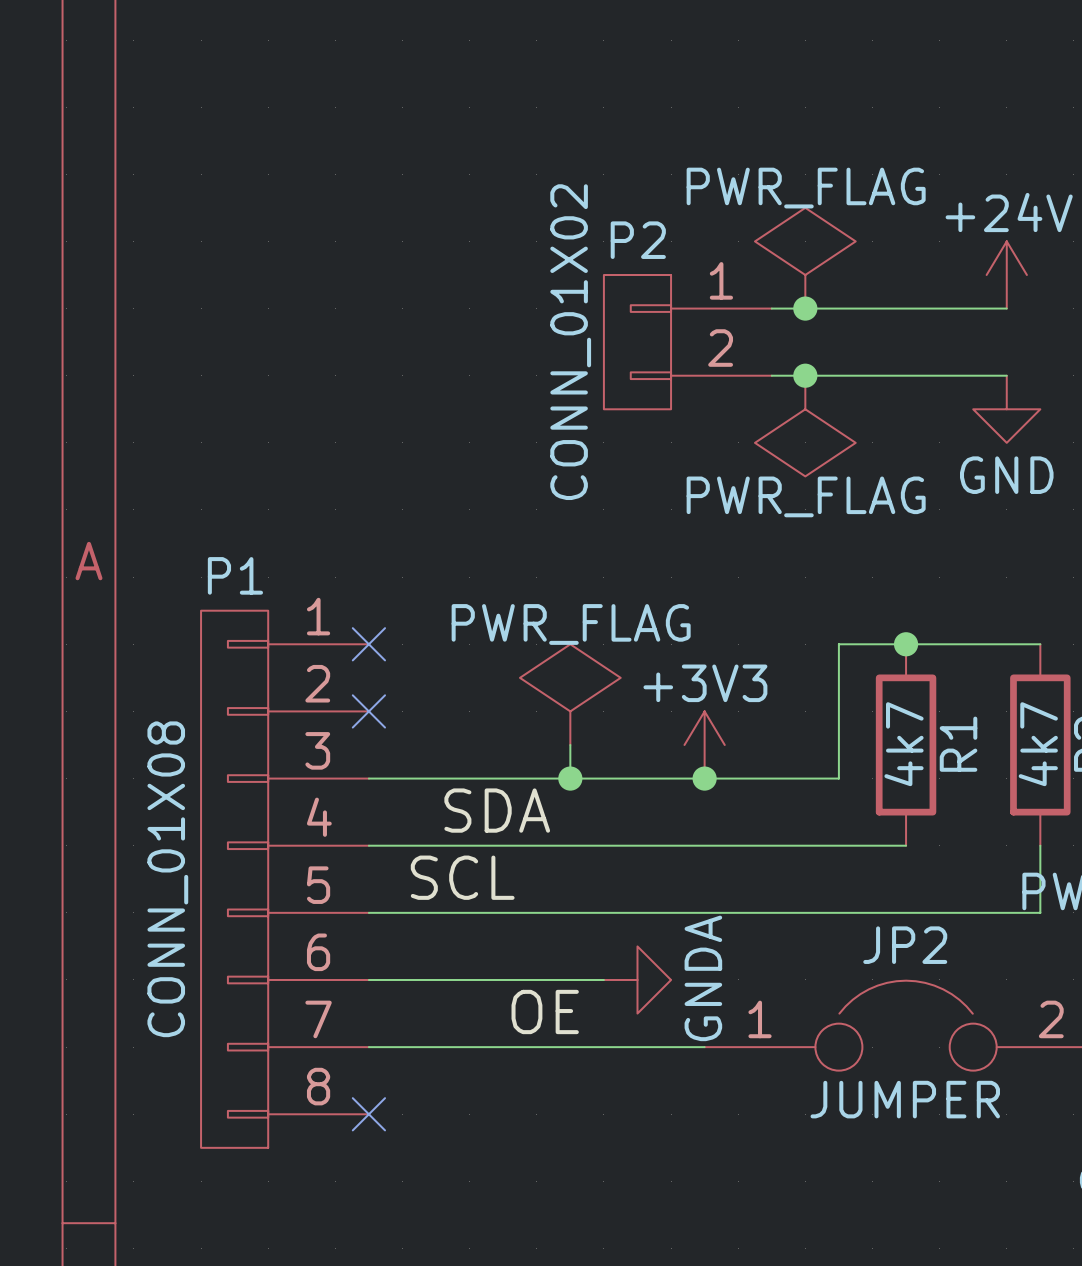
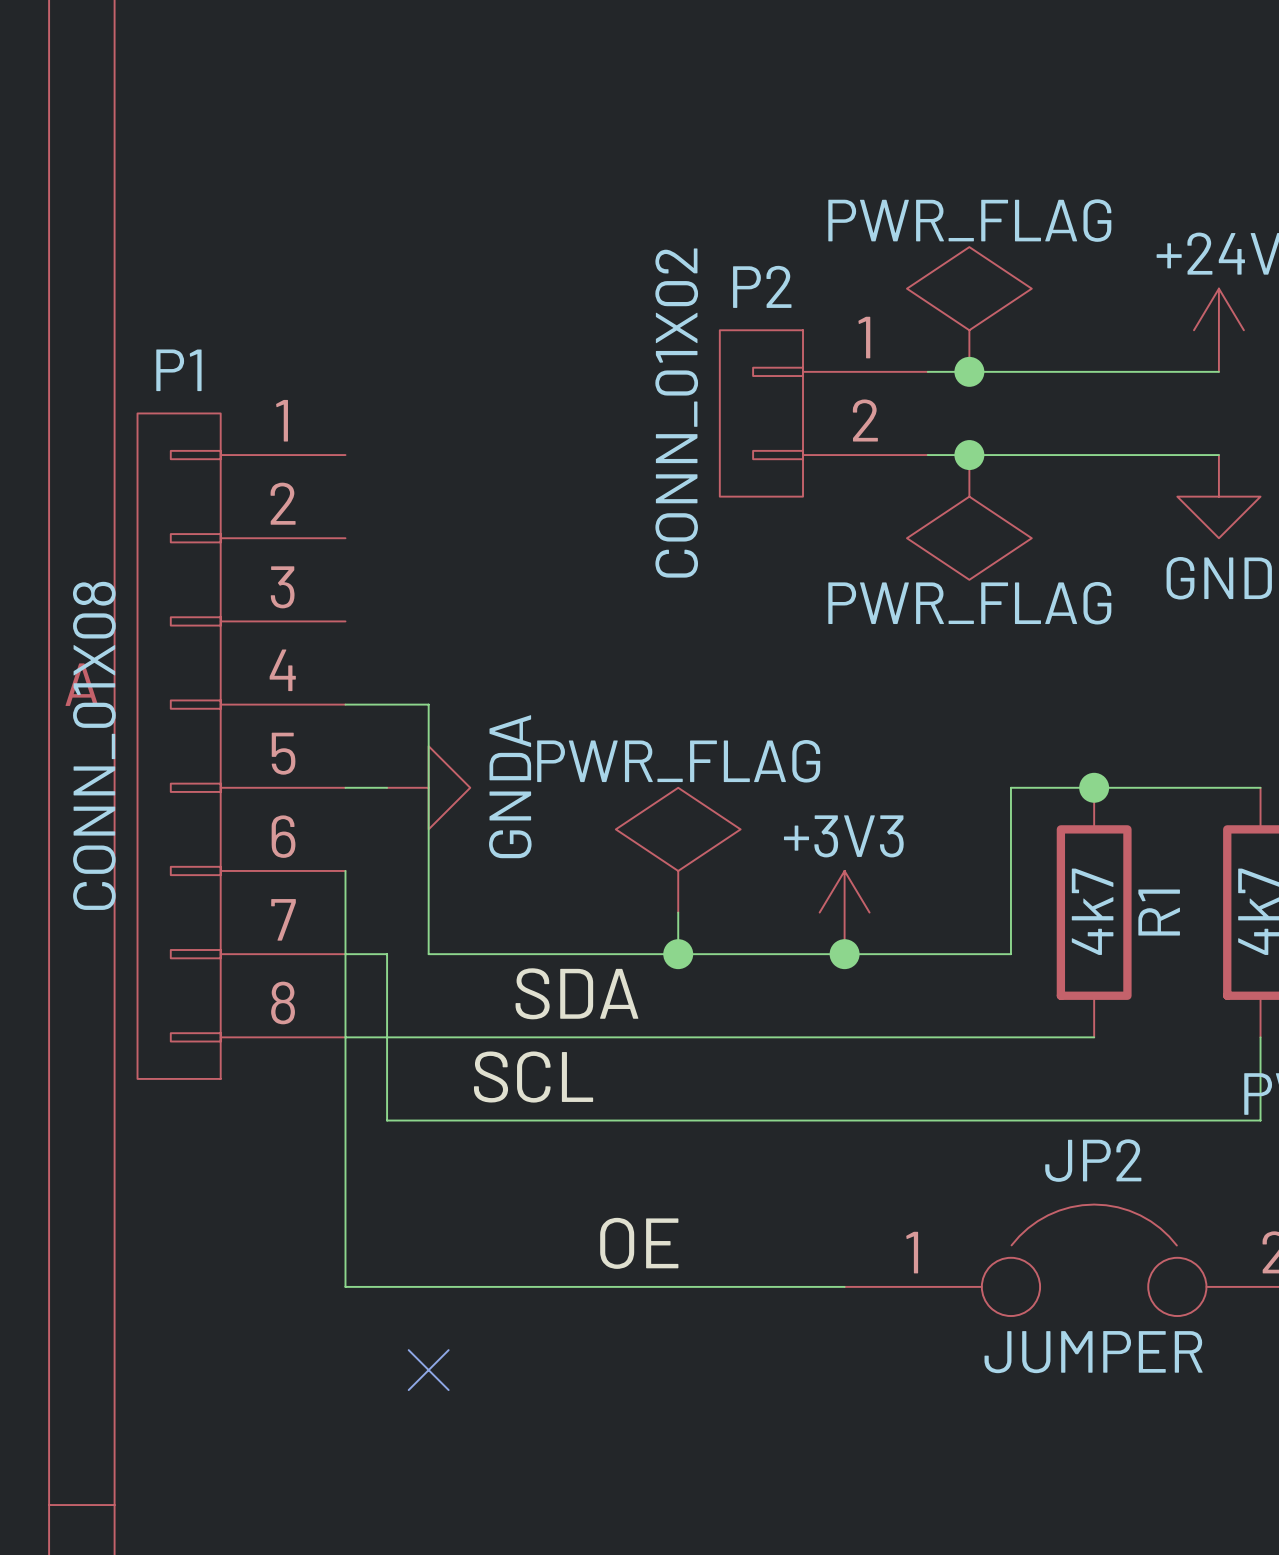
wire: none -> (345, 704) (428, 704) (428, 954)
no-connect mark: (368, 644) -> none
wire: none -> (345, 870) (345, 1286) (428, 1286)
no-connect mark: (368, 711) -> none
wire: none -> (345, 954) (387, 954) (387, 1120) (428, 1120)
P1 position: (284, 879) -> (241, 746)
wire: (368, 979) (603, 979) -> none
power symbol position: GNDA (637, 979) -> GNDA (428, 787)

